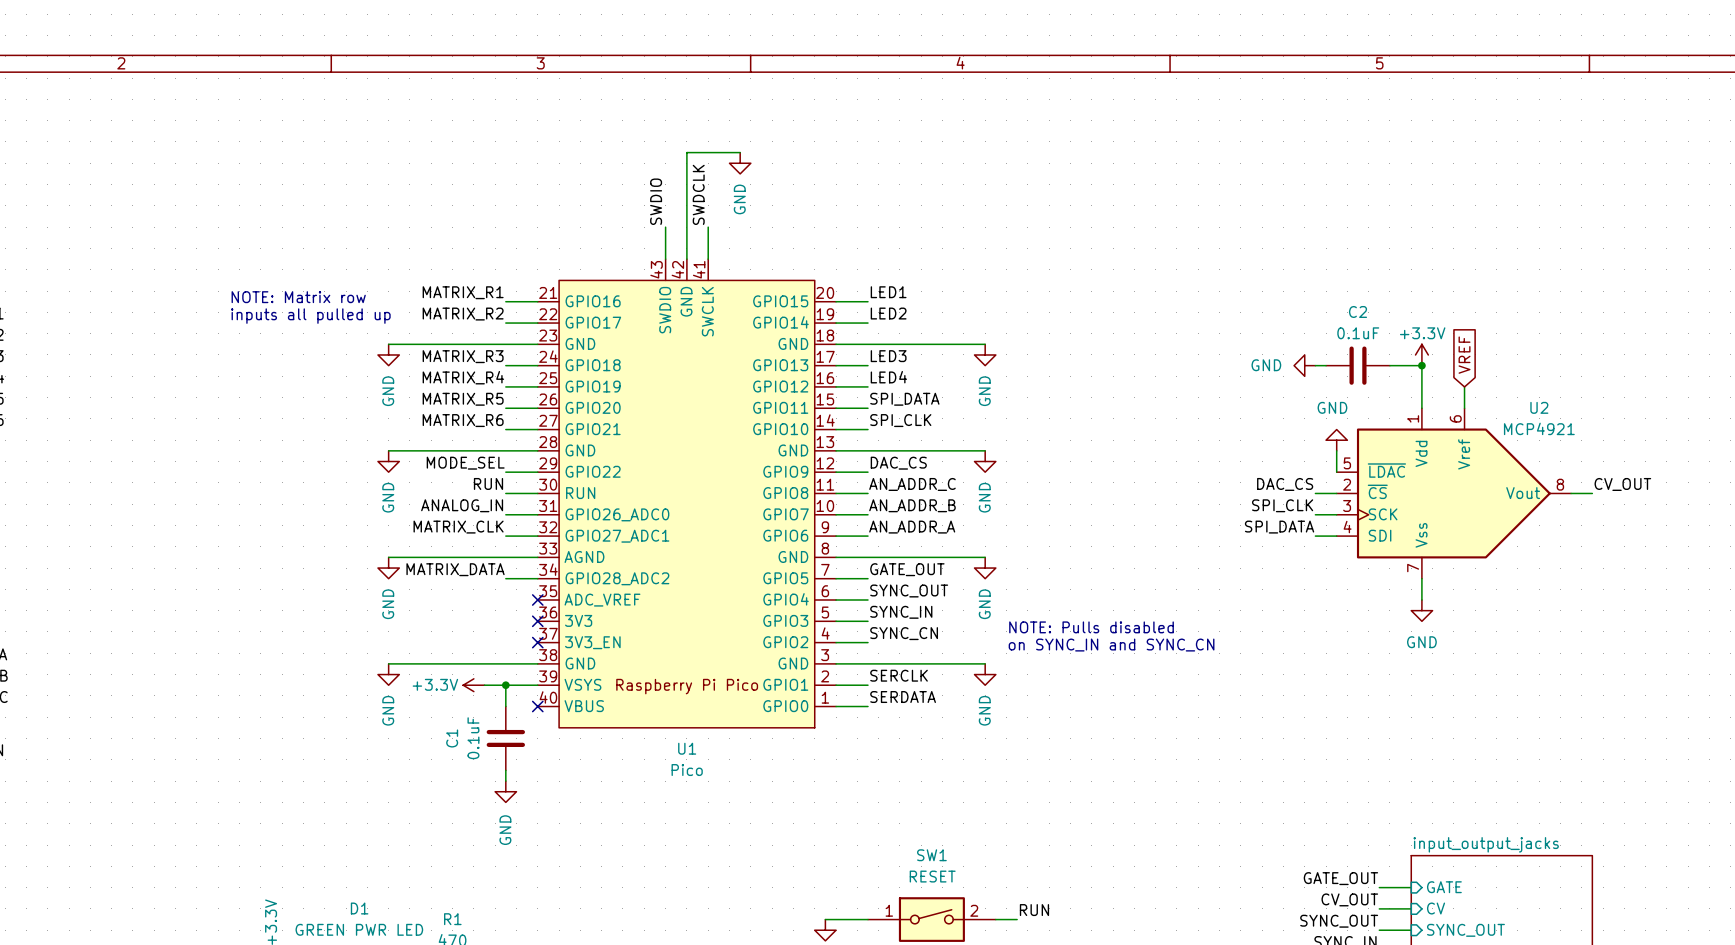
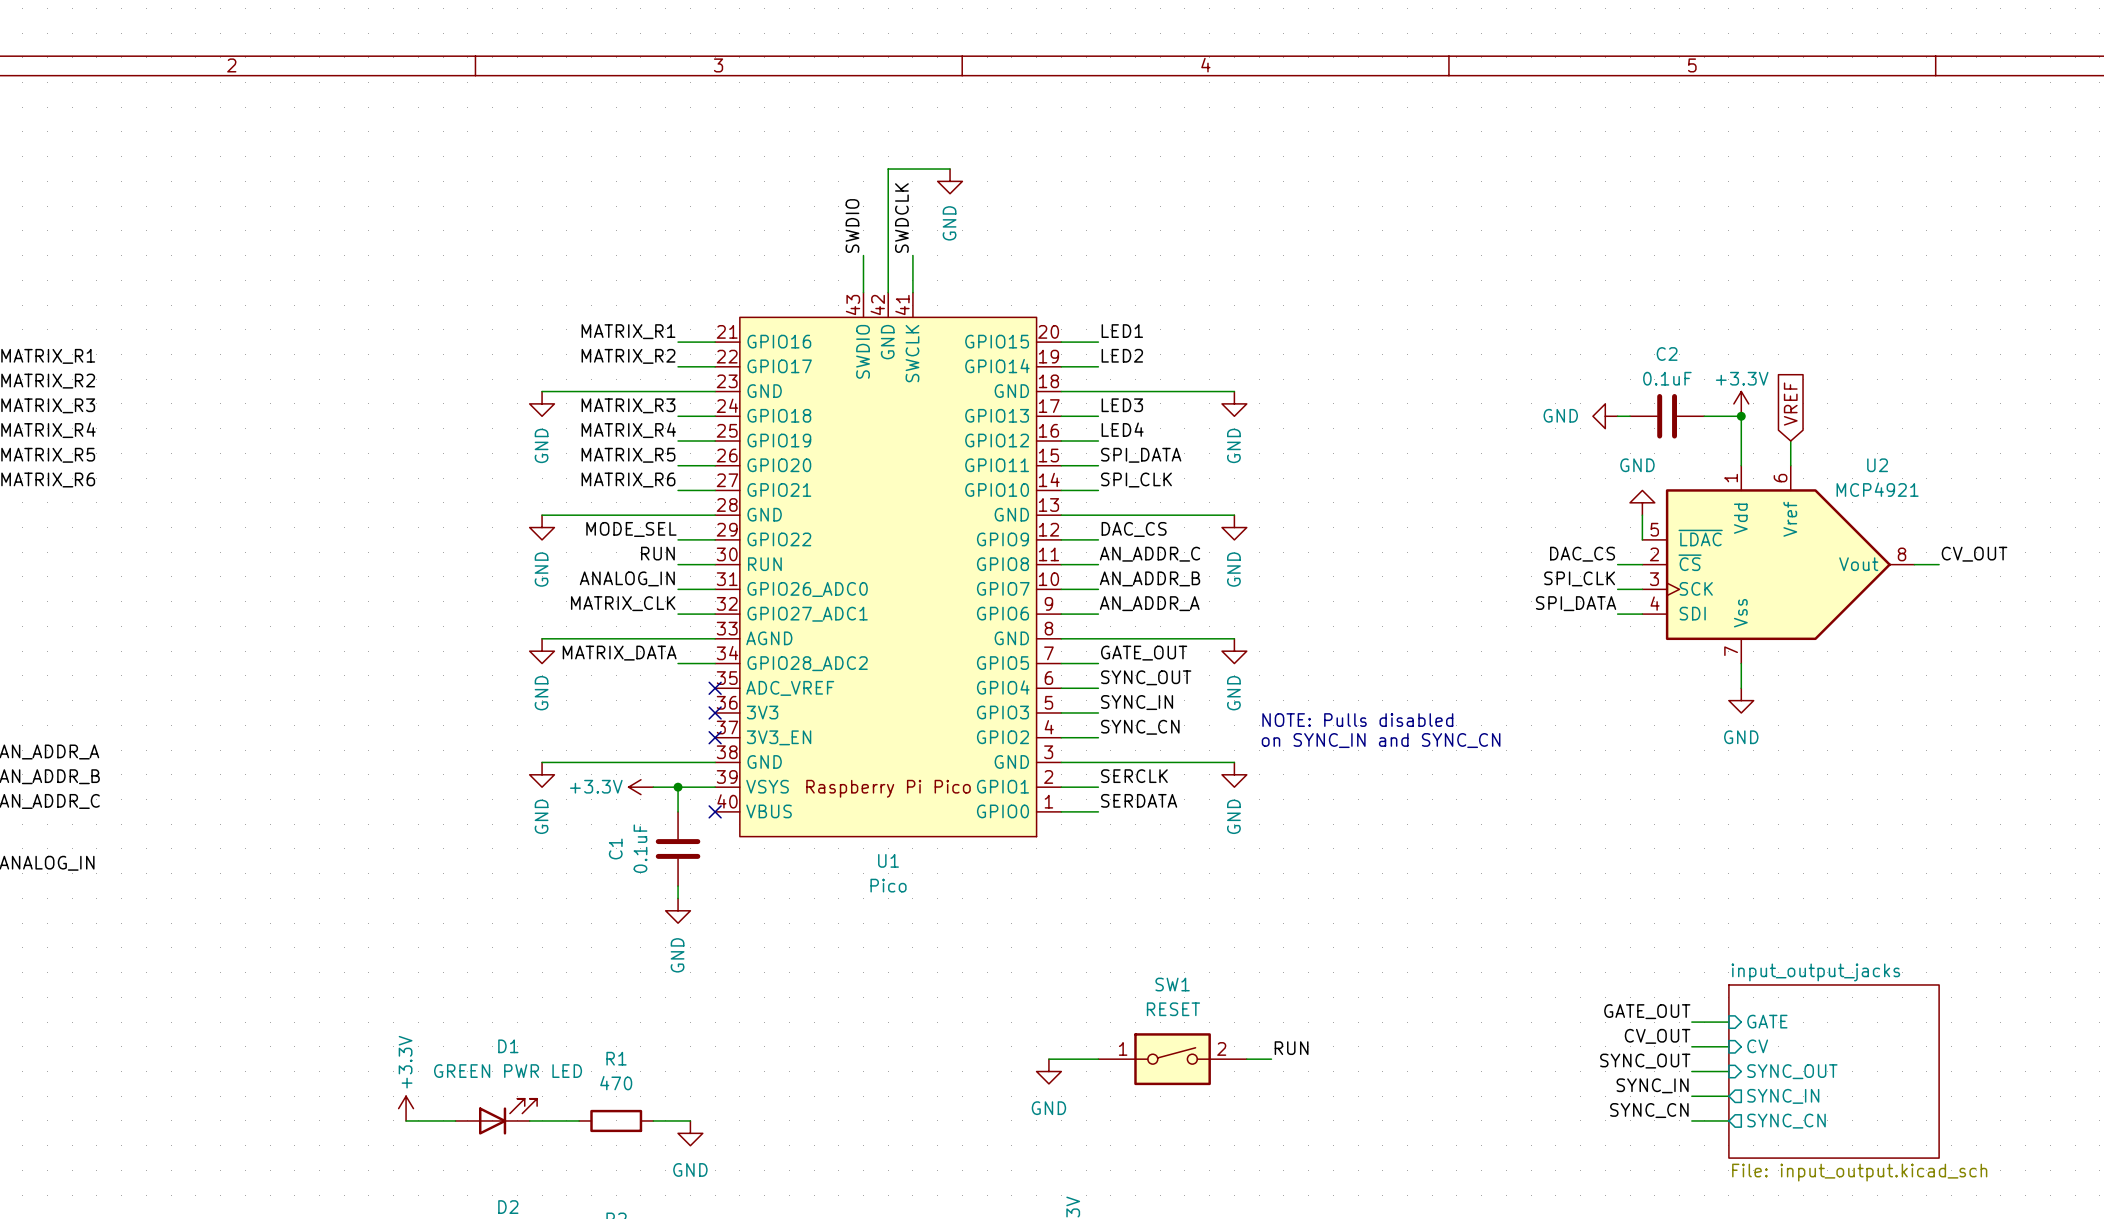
text: NOTE: Matrix row (298, 297) -> none
text: inputs all pulled up (310, 316) -> none

